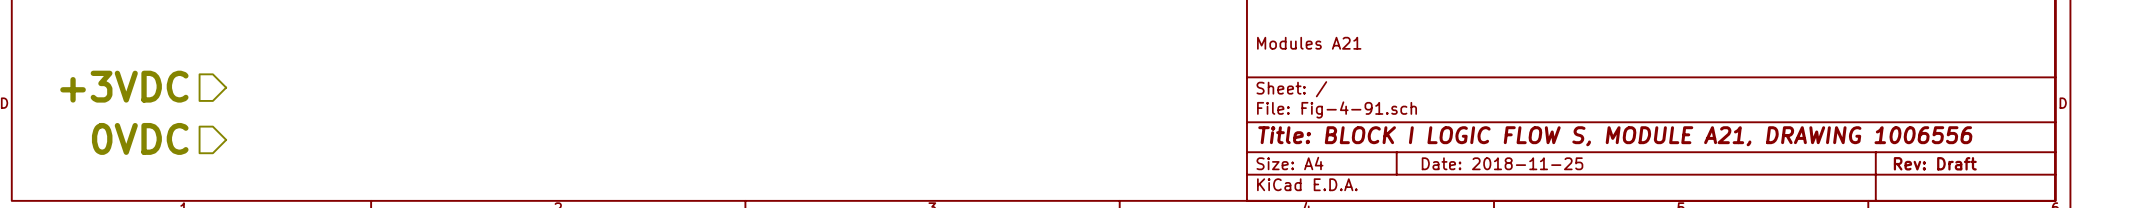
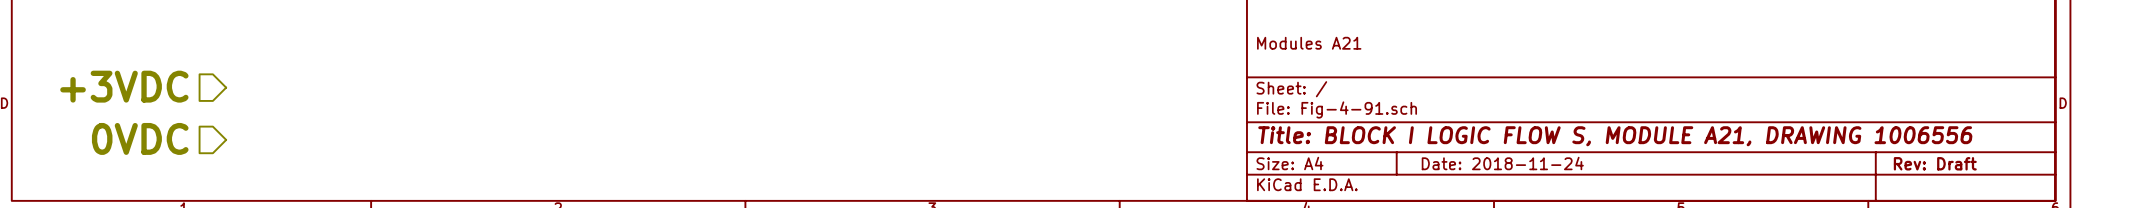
title block: Date: 2018-11-25 (1502, 163) -> Date: 2018-11-24 (1502, 163)

